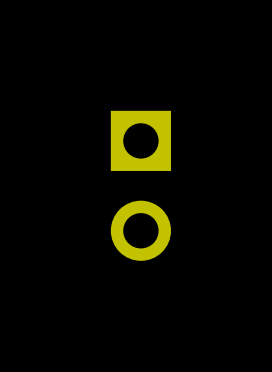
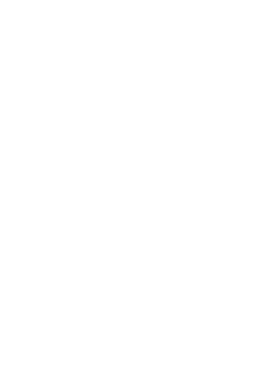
part: (140, 185) -> none

